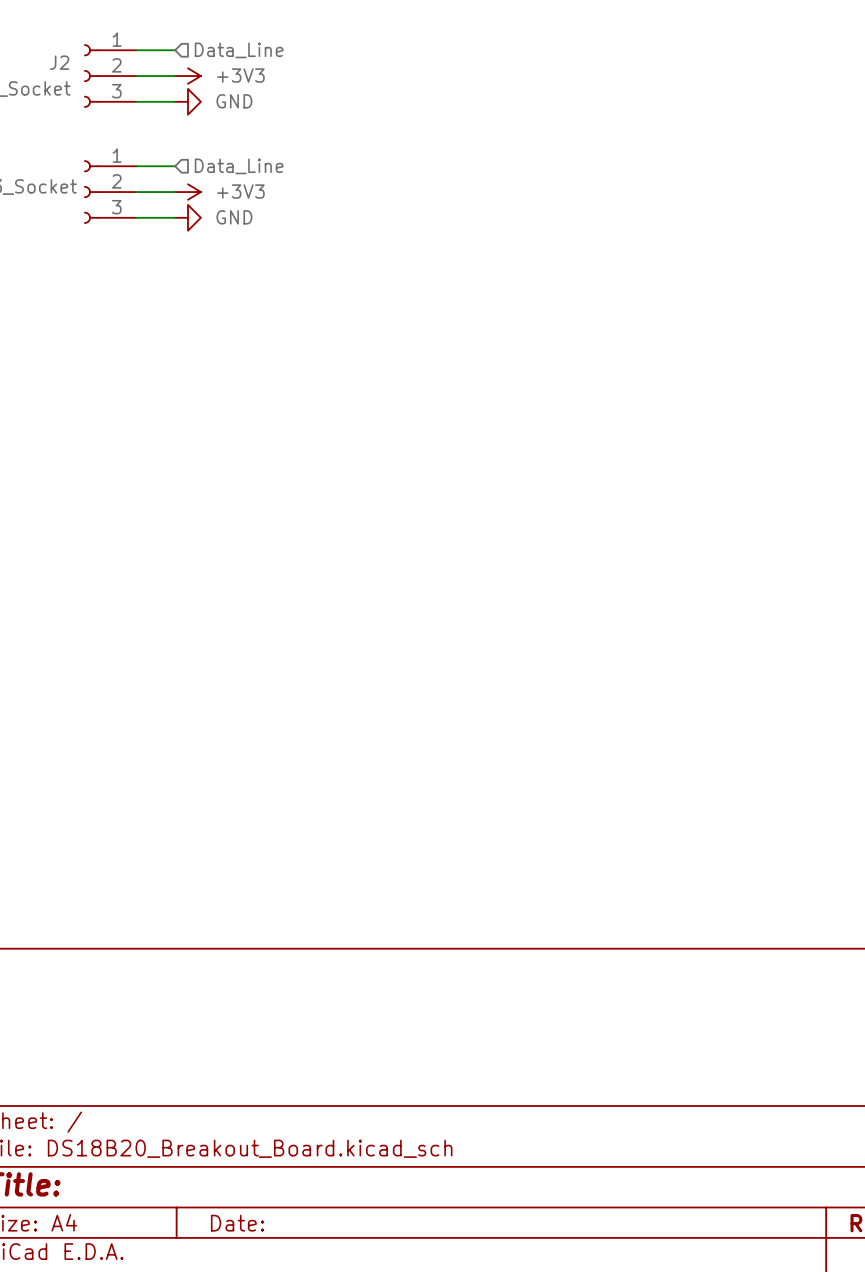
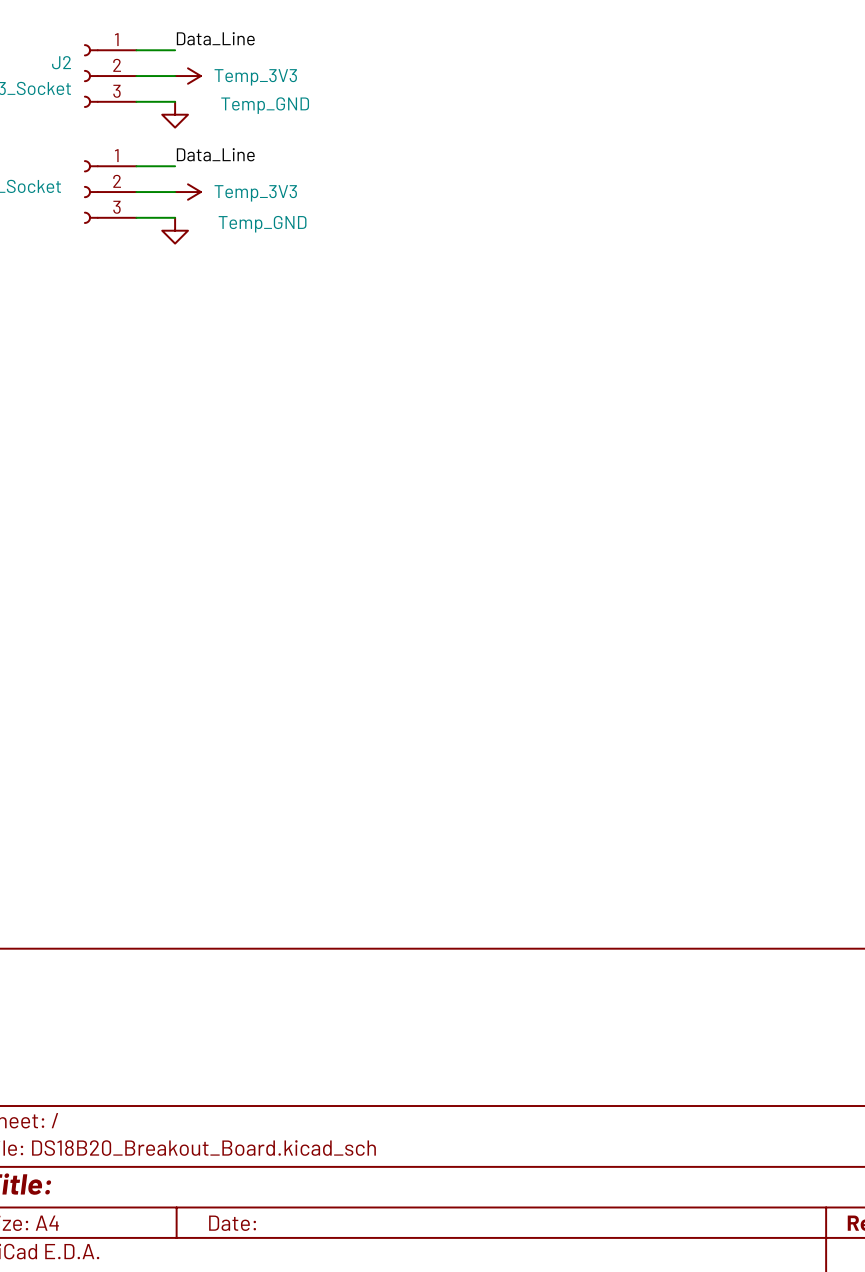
label: none -> Data_Line (215, 38)
hierarchical label: Data_Line (239, 50) -> none
power symbol: +3V3 (187, 76) -> Temp_3V3 (187, 76)
power symbol: GND (187, 101) -> none
power symbol: none -> Temp_GND (175, 114)
label: none -> Data_Line (215, 154)
hierarchical label: Data_Line (239, 166) -> none
power symbol: +3V3 (187, 192) -> Temp_3V3 (187, 192)
power symbol: GND (187, 217) -> none
power symbol: none -> Temp_GND (175, 230)

